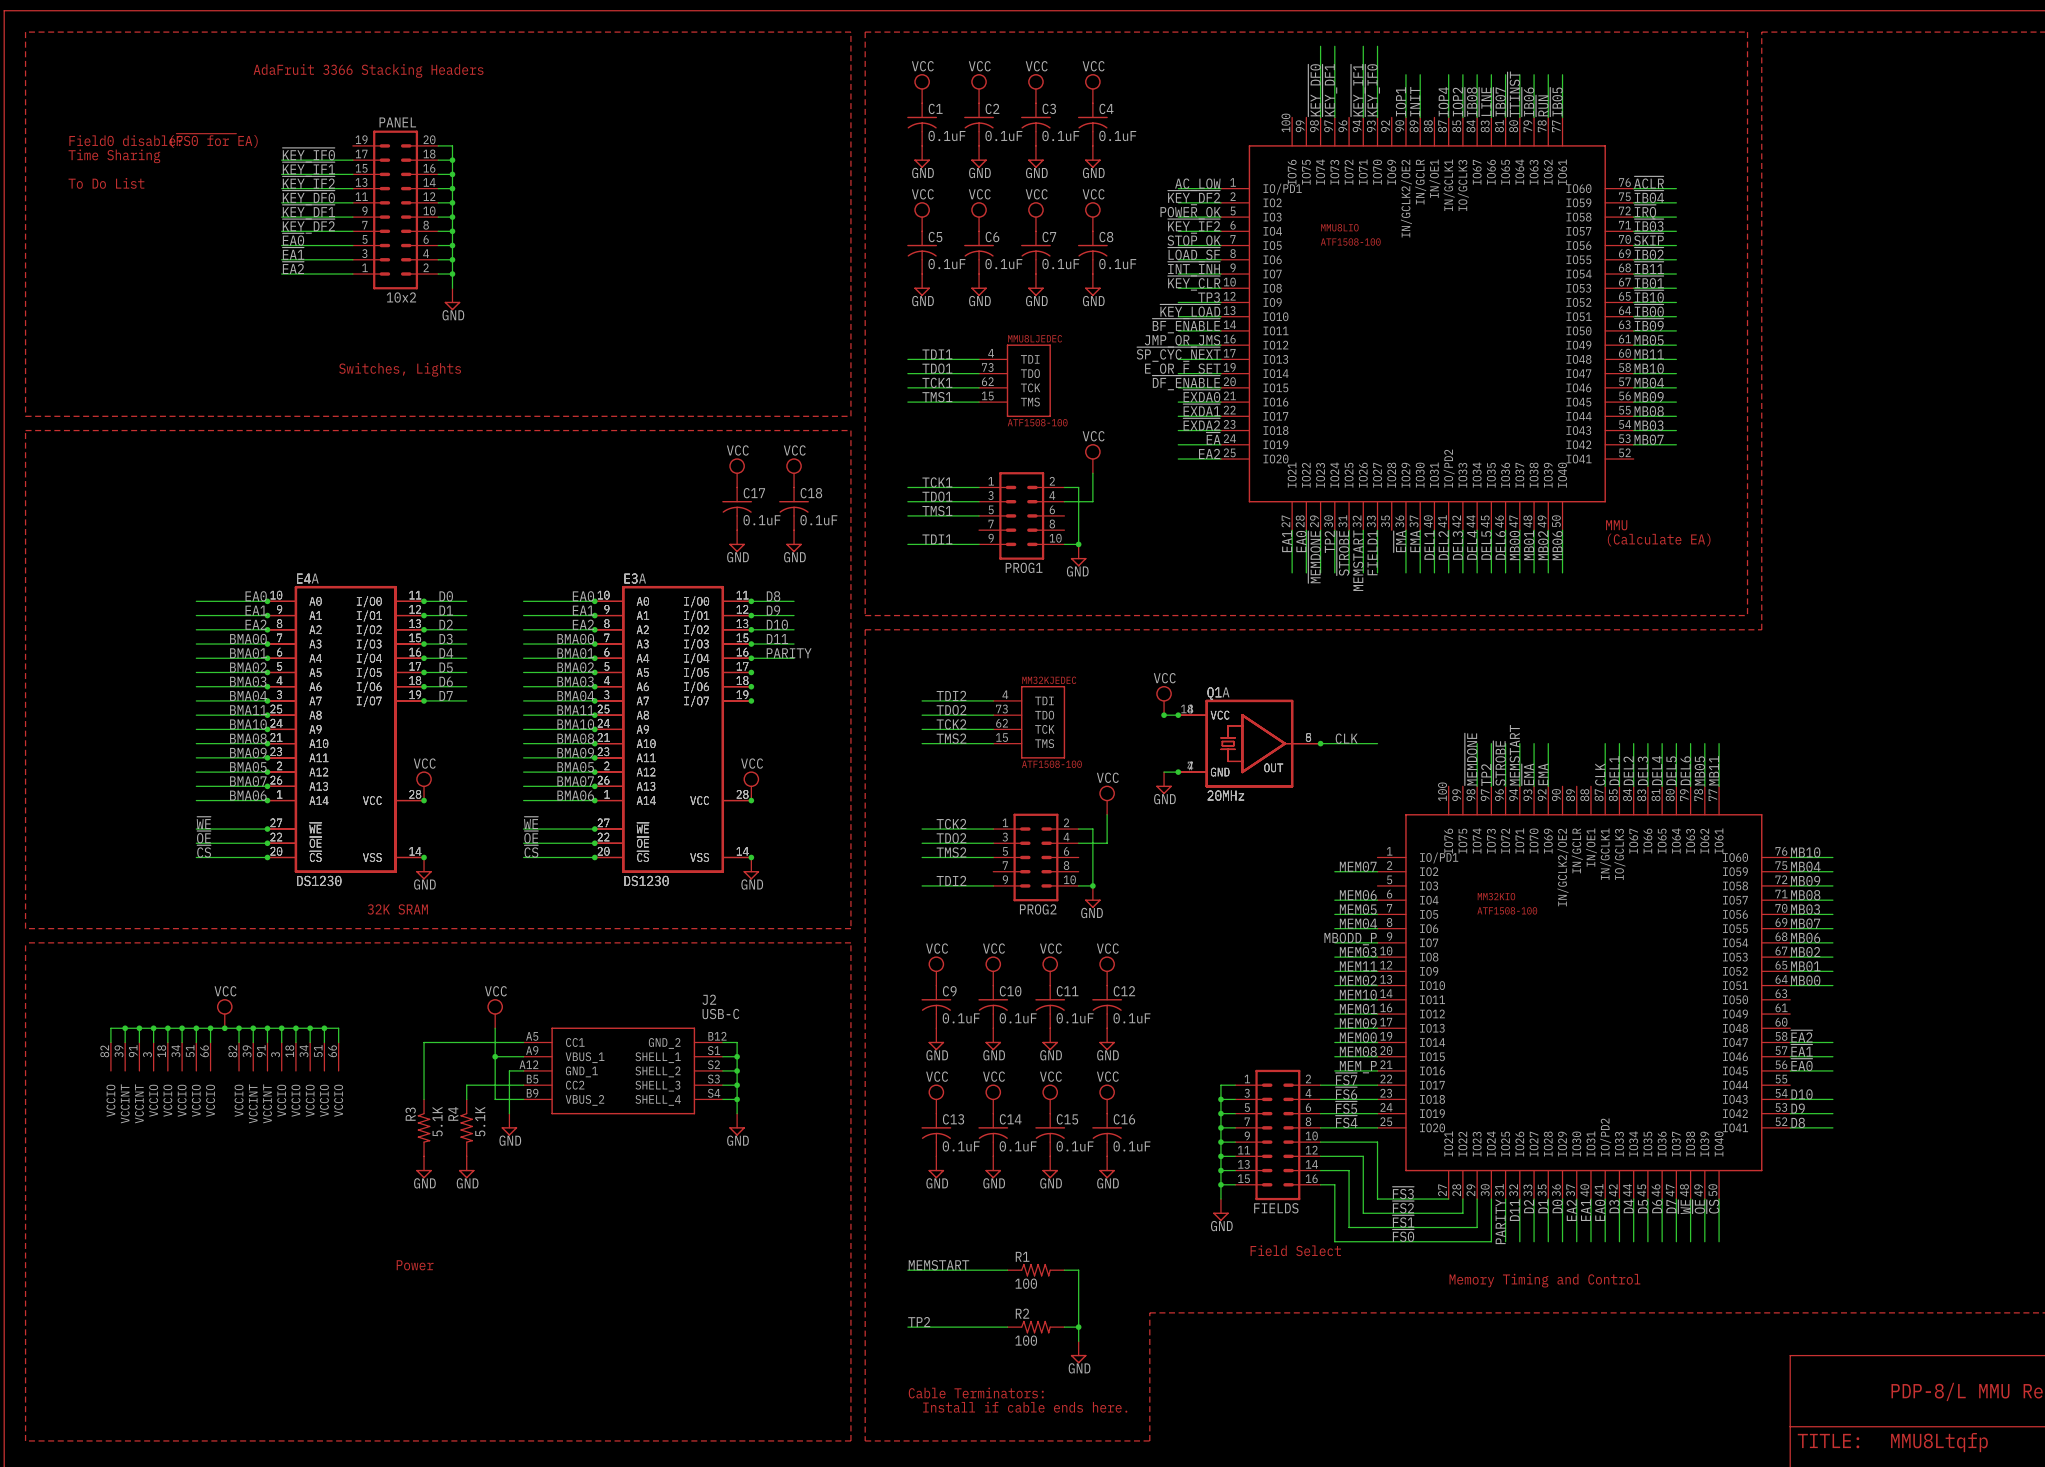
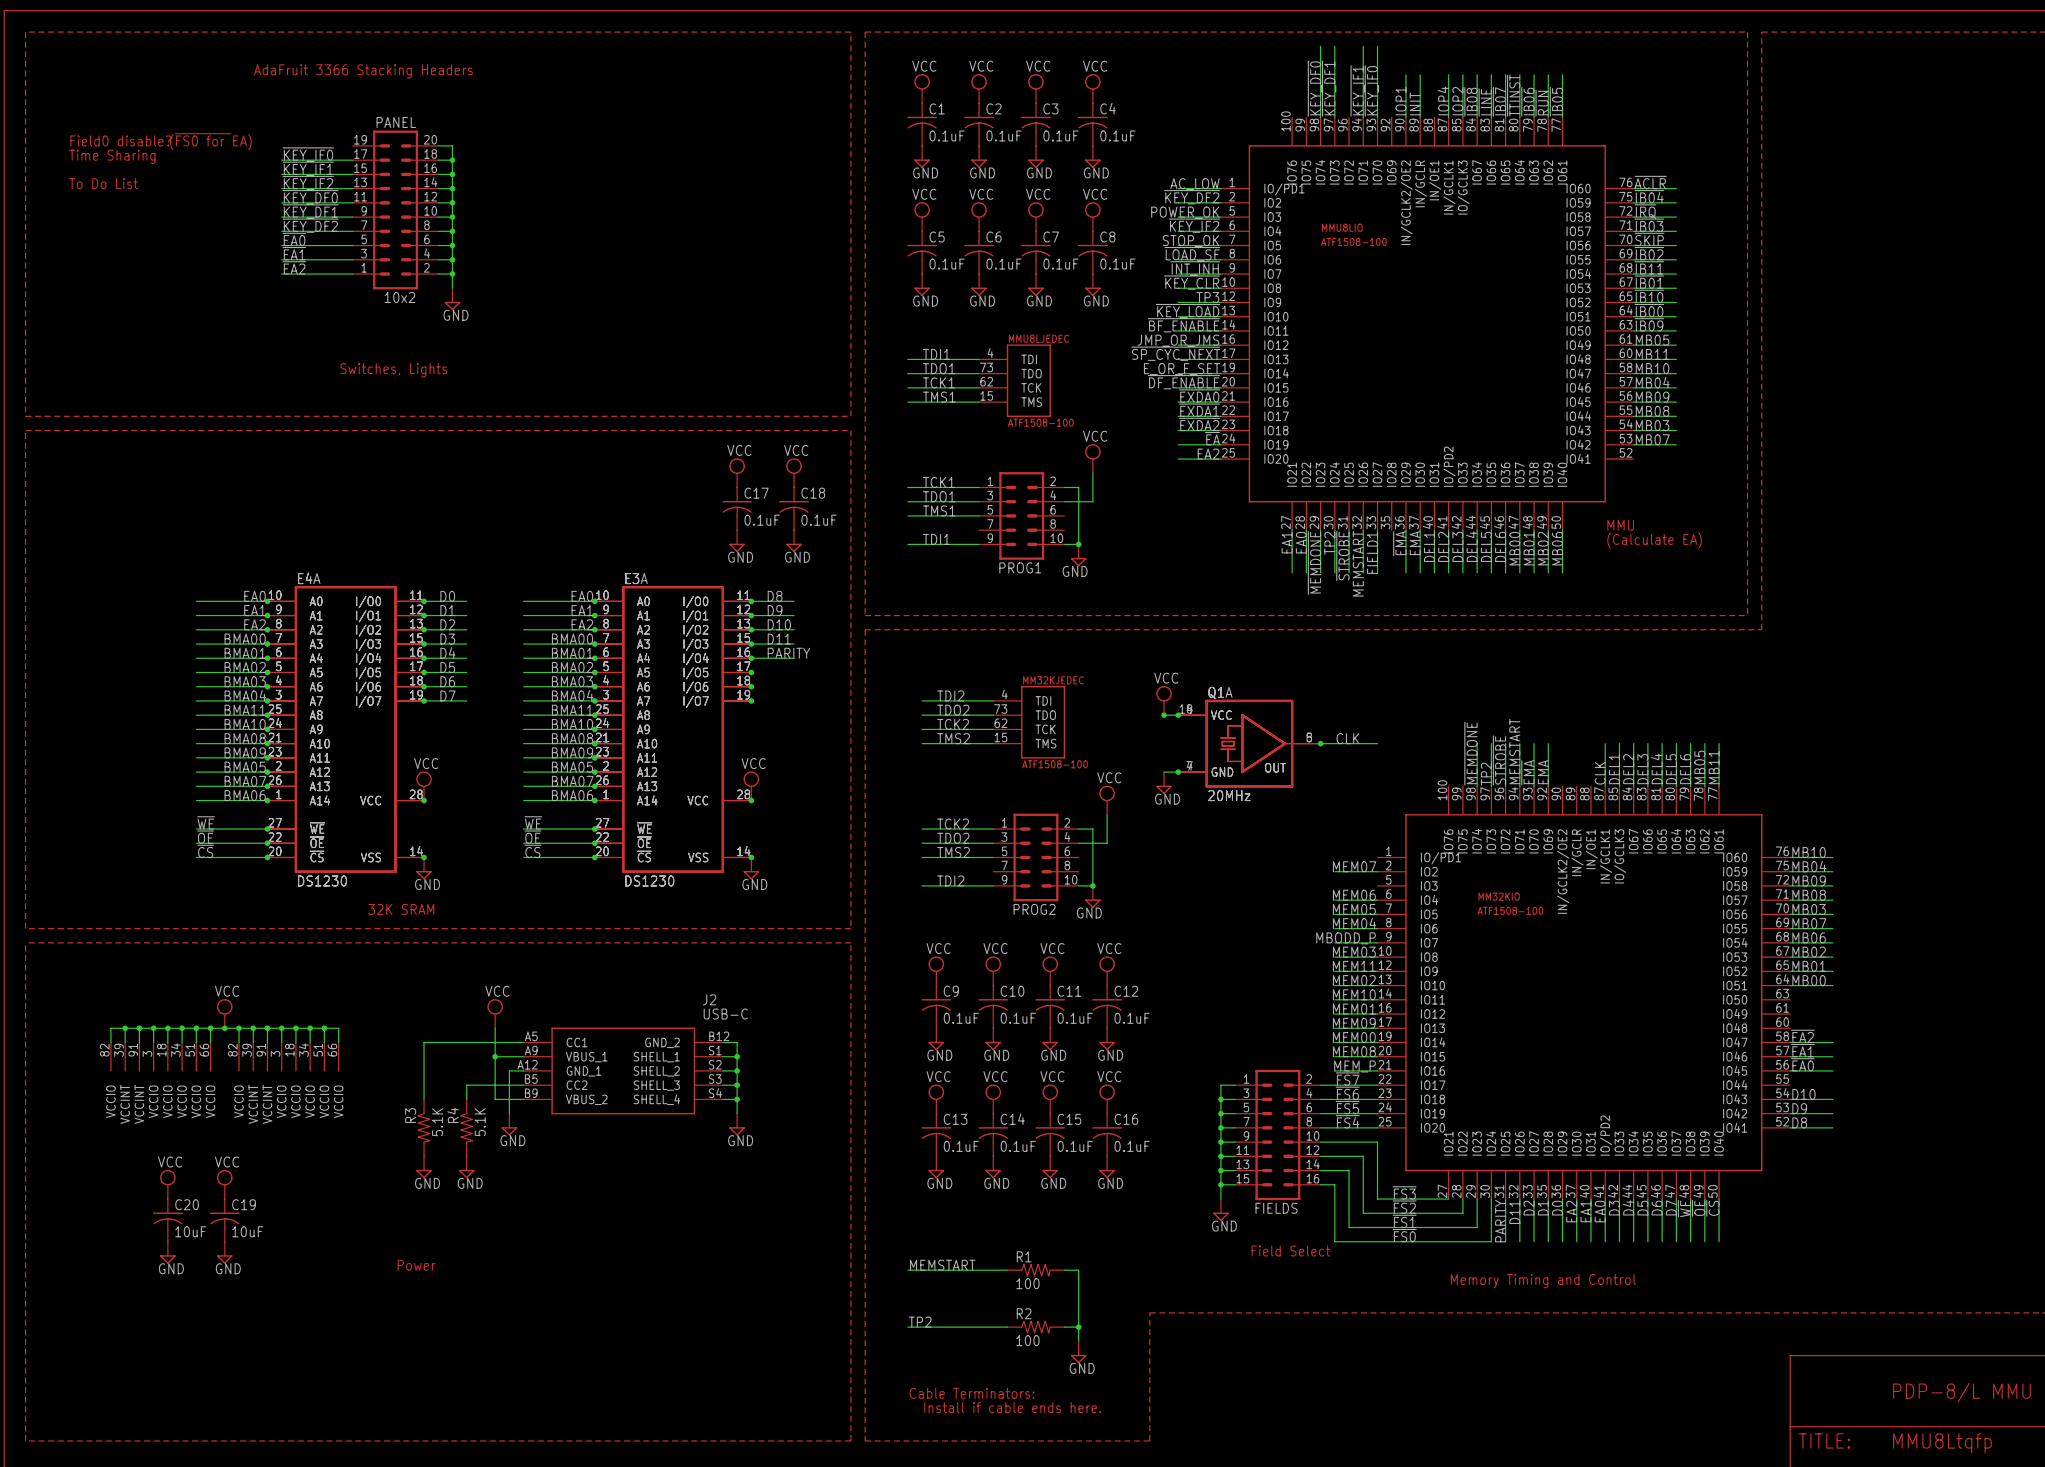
power symbol: none -> VCC (167, 1184)
power symbol: none -> VCC (224, 1184)
C20: none -> 10uF (167, 1220)
C19: none -> 10uF (224, 1220)
power symbol: none -> GND (167, 1252)
power symbol: none -> GND (224, 1252)

